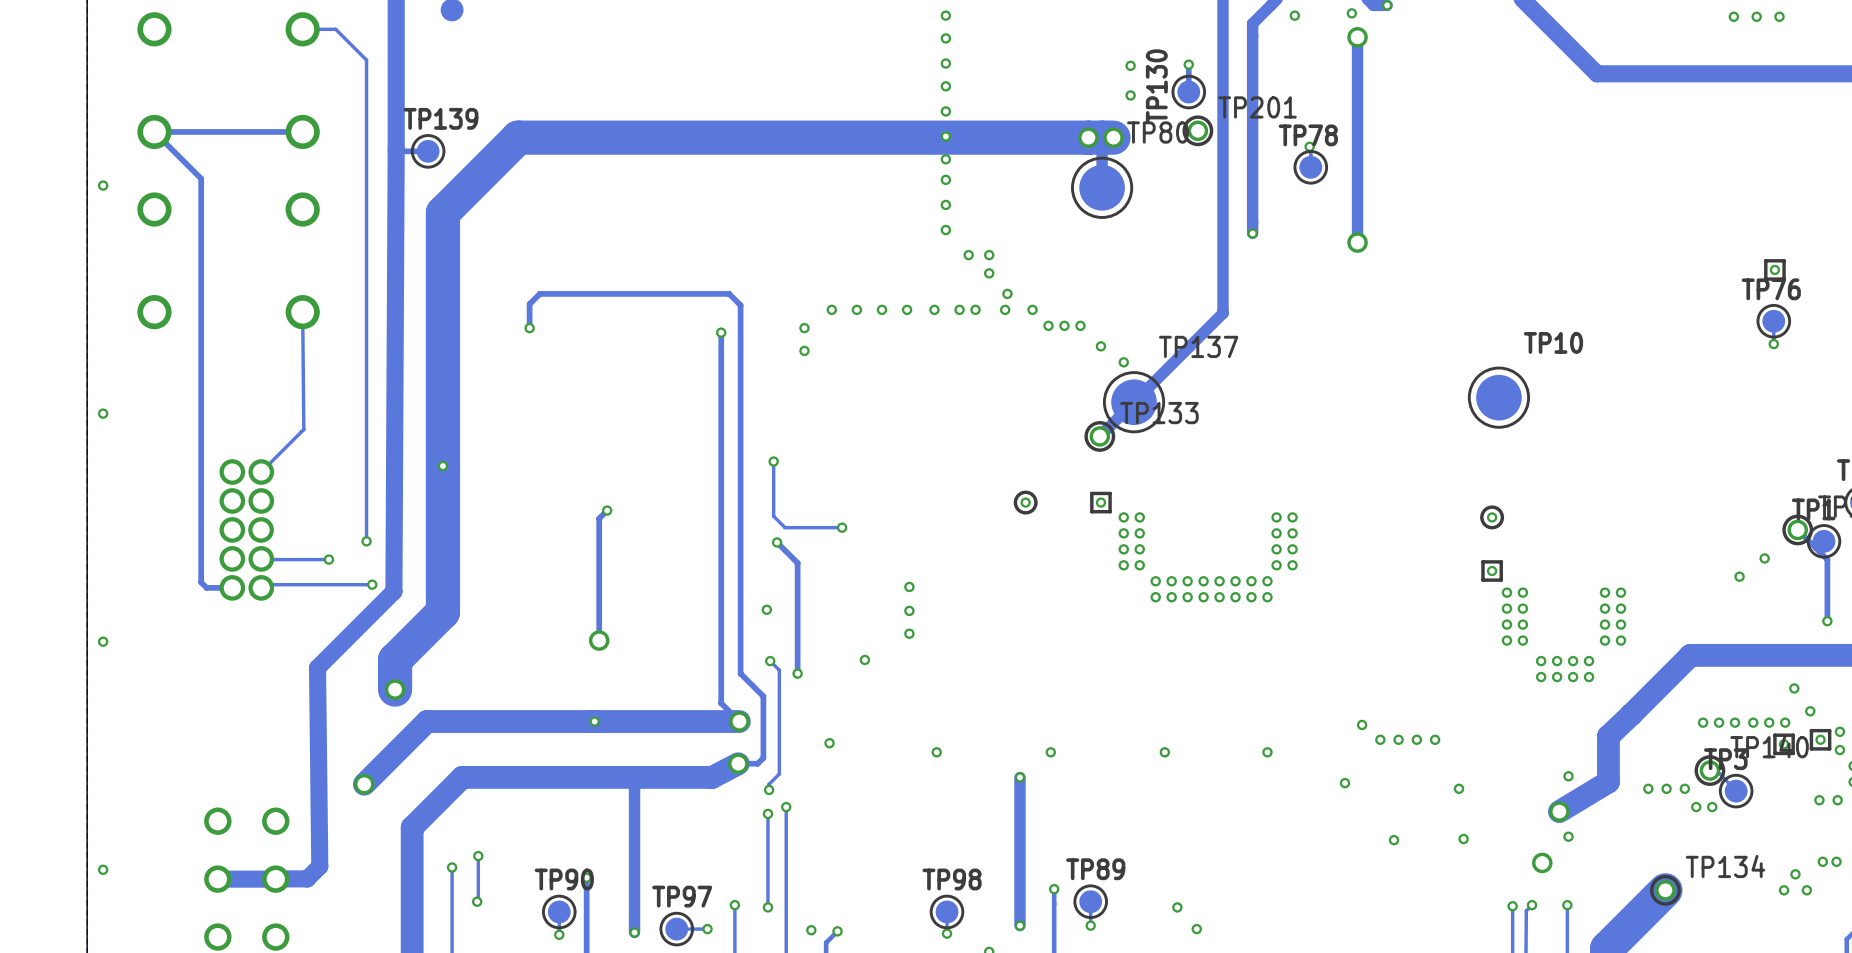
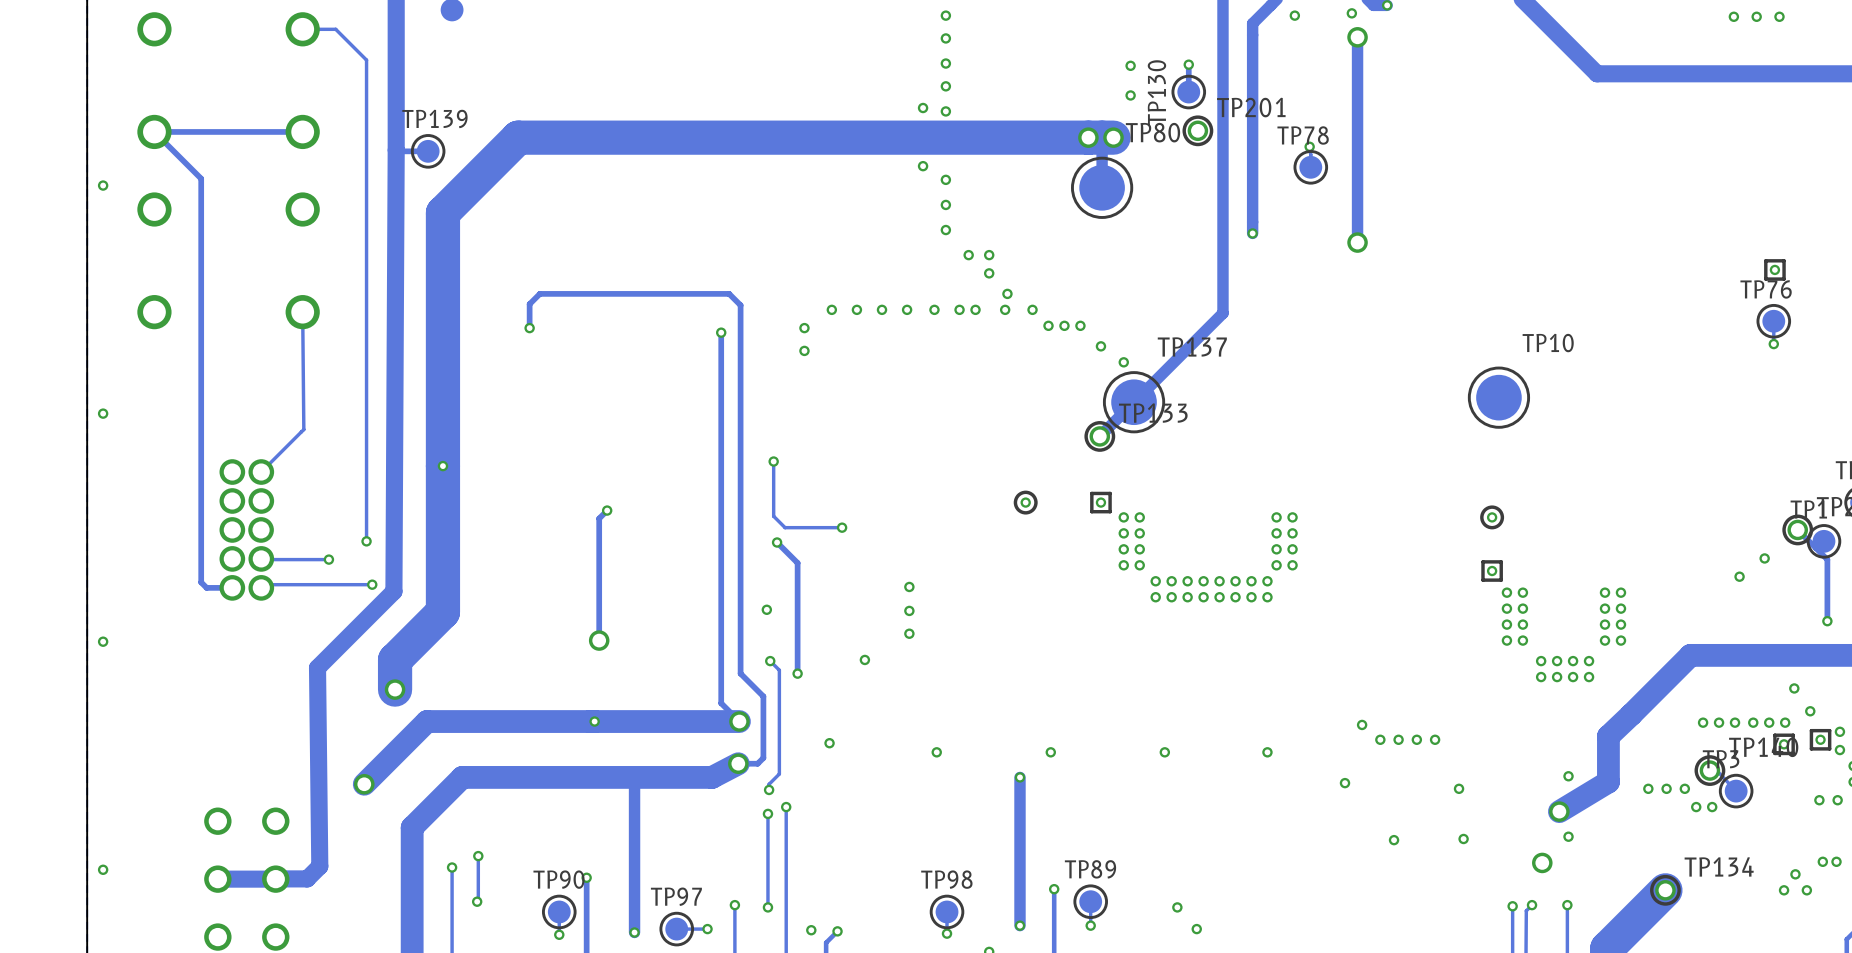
via: none -> (923, 108)
via: (945, 136) -> none
via: (945, 159) -> none
via: none -> (923, 166)

